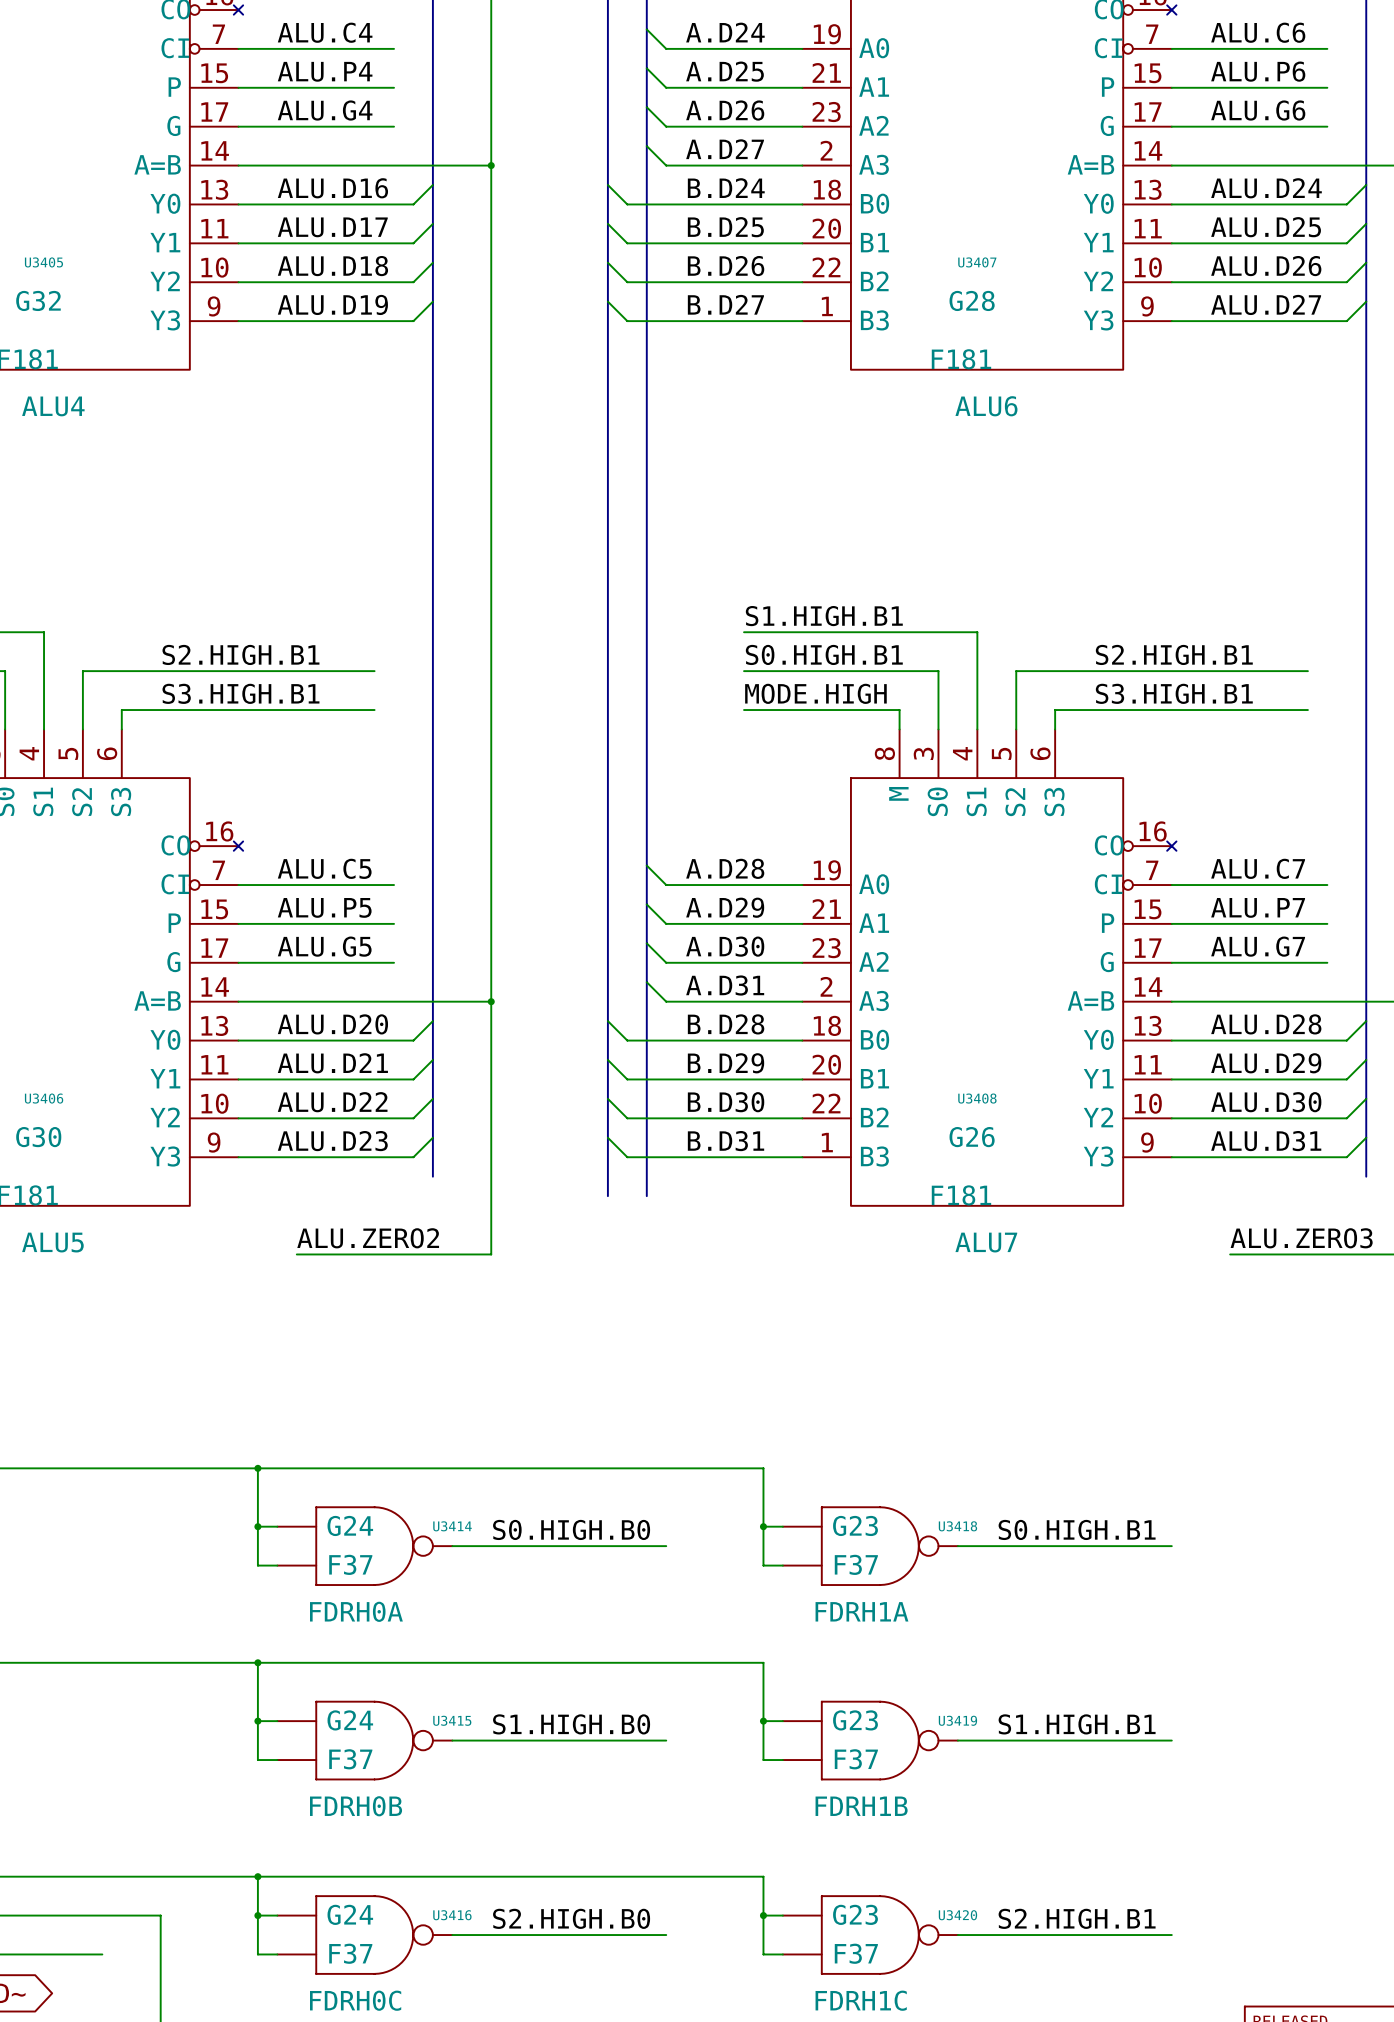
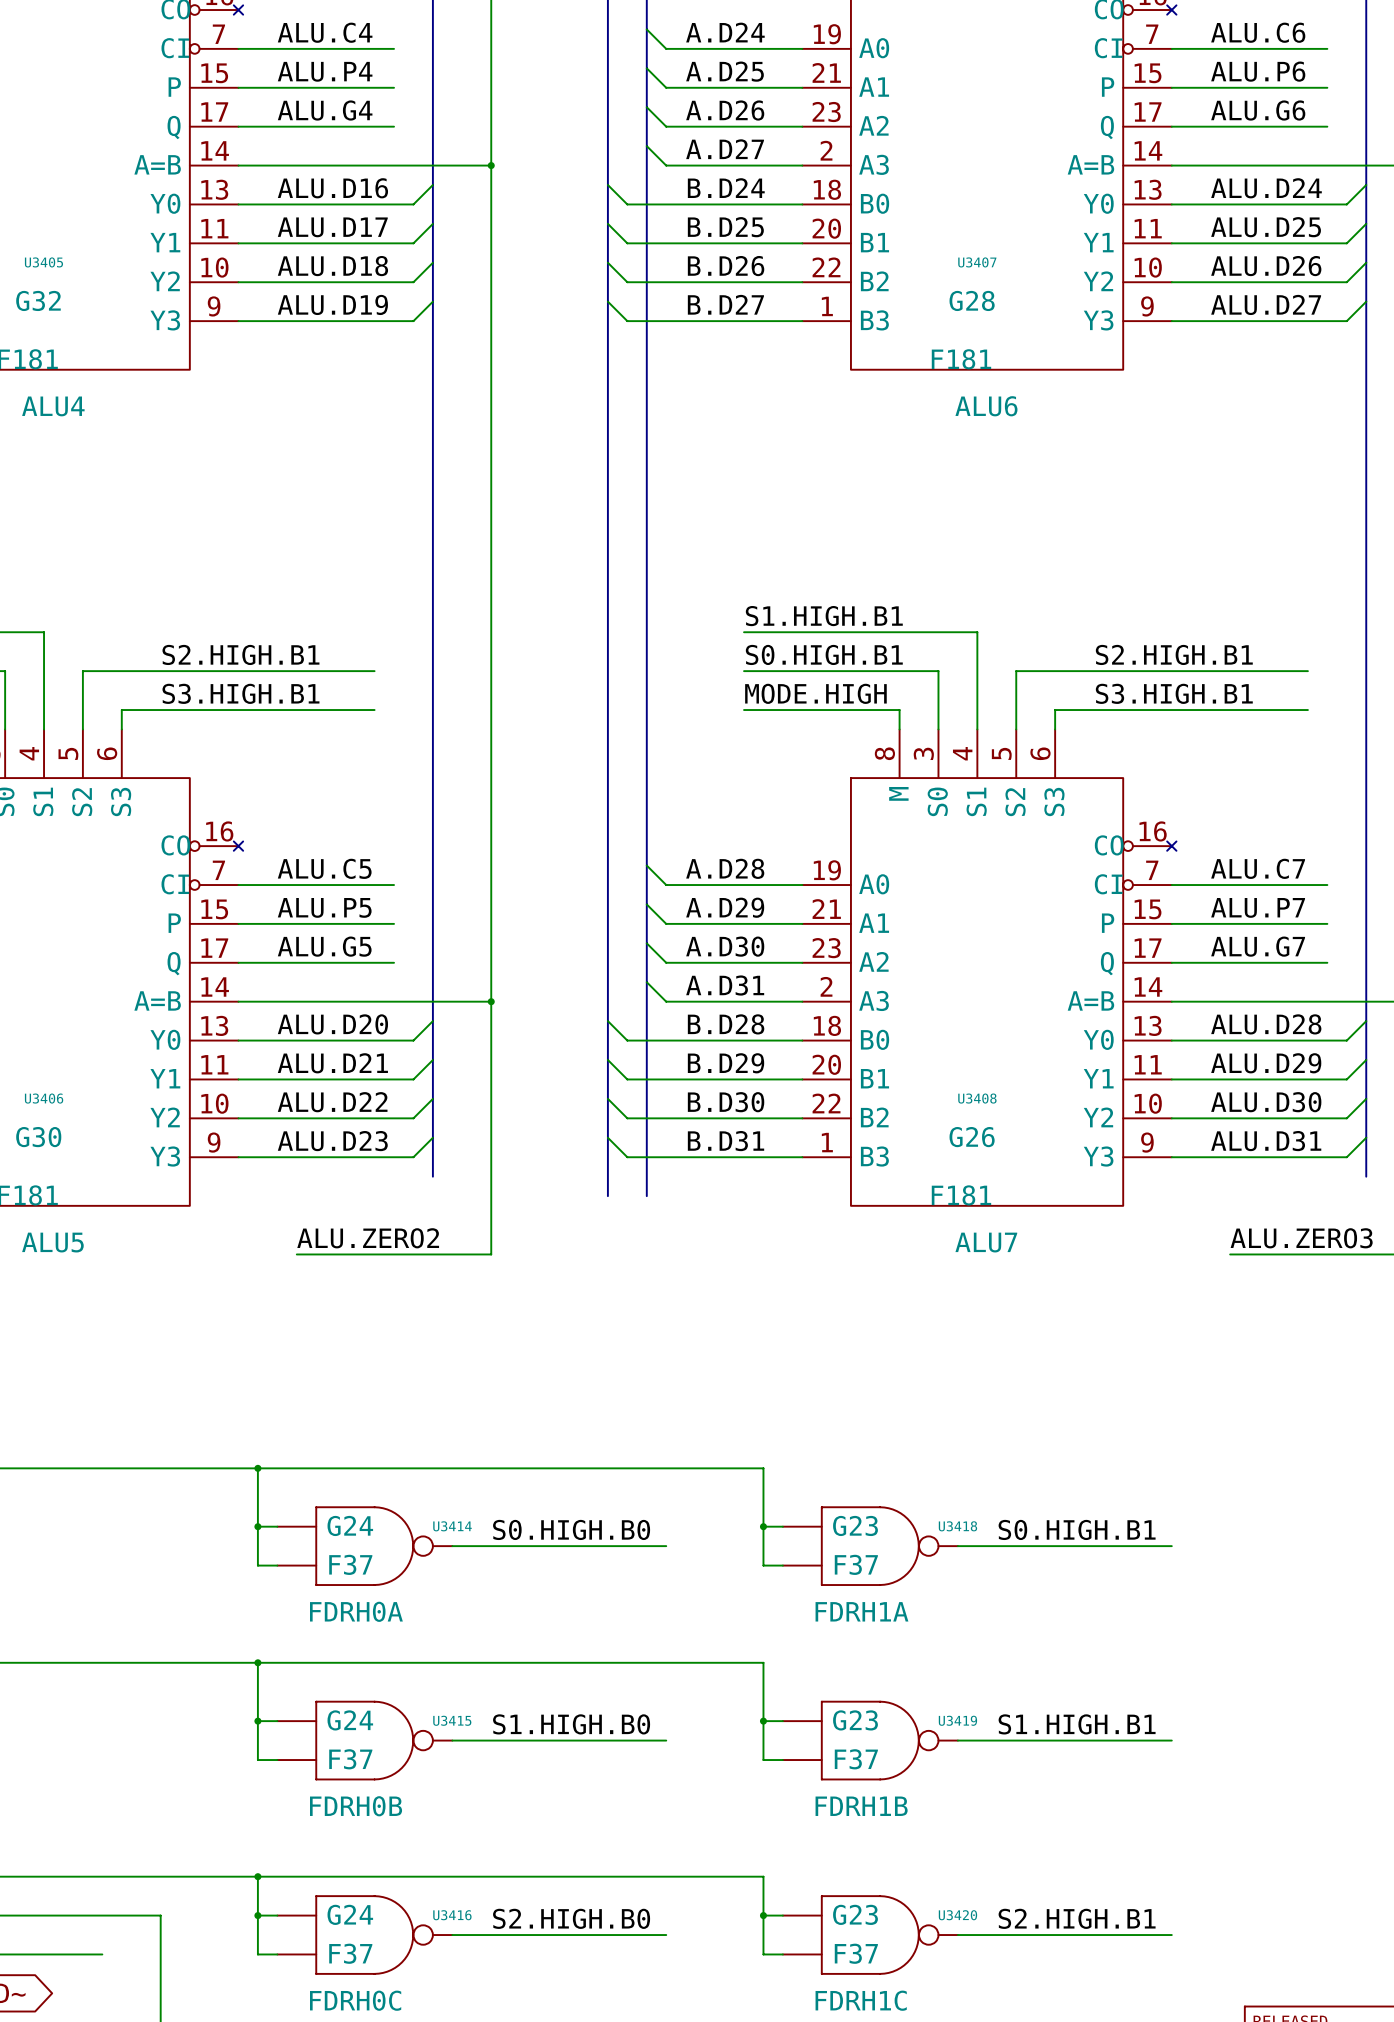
U3405 pin name: G (173, 125) -> Q (174, 127)
U3407 pin name: G (1107, 125) -> Q (1107, 127)
U3406 pin name: G (173, 962) -> Q (174, 963)
U3408 pin name: G (1107, 962) -> Q (1107, 963)

